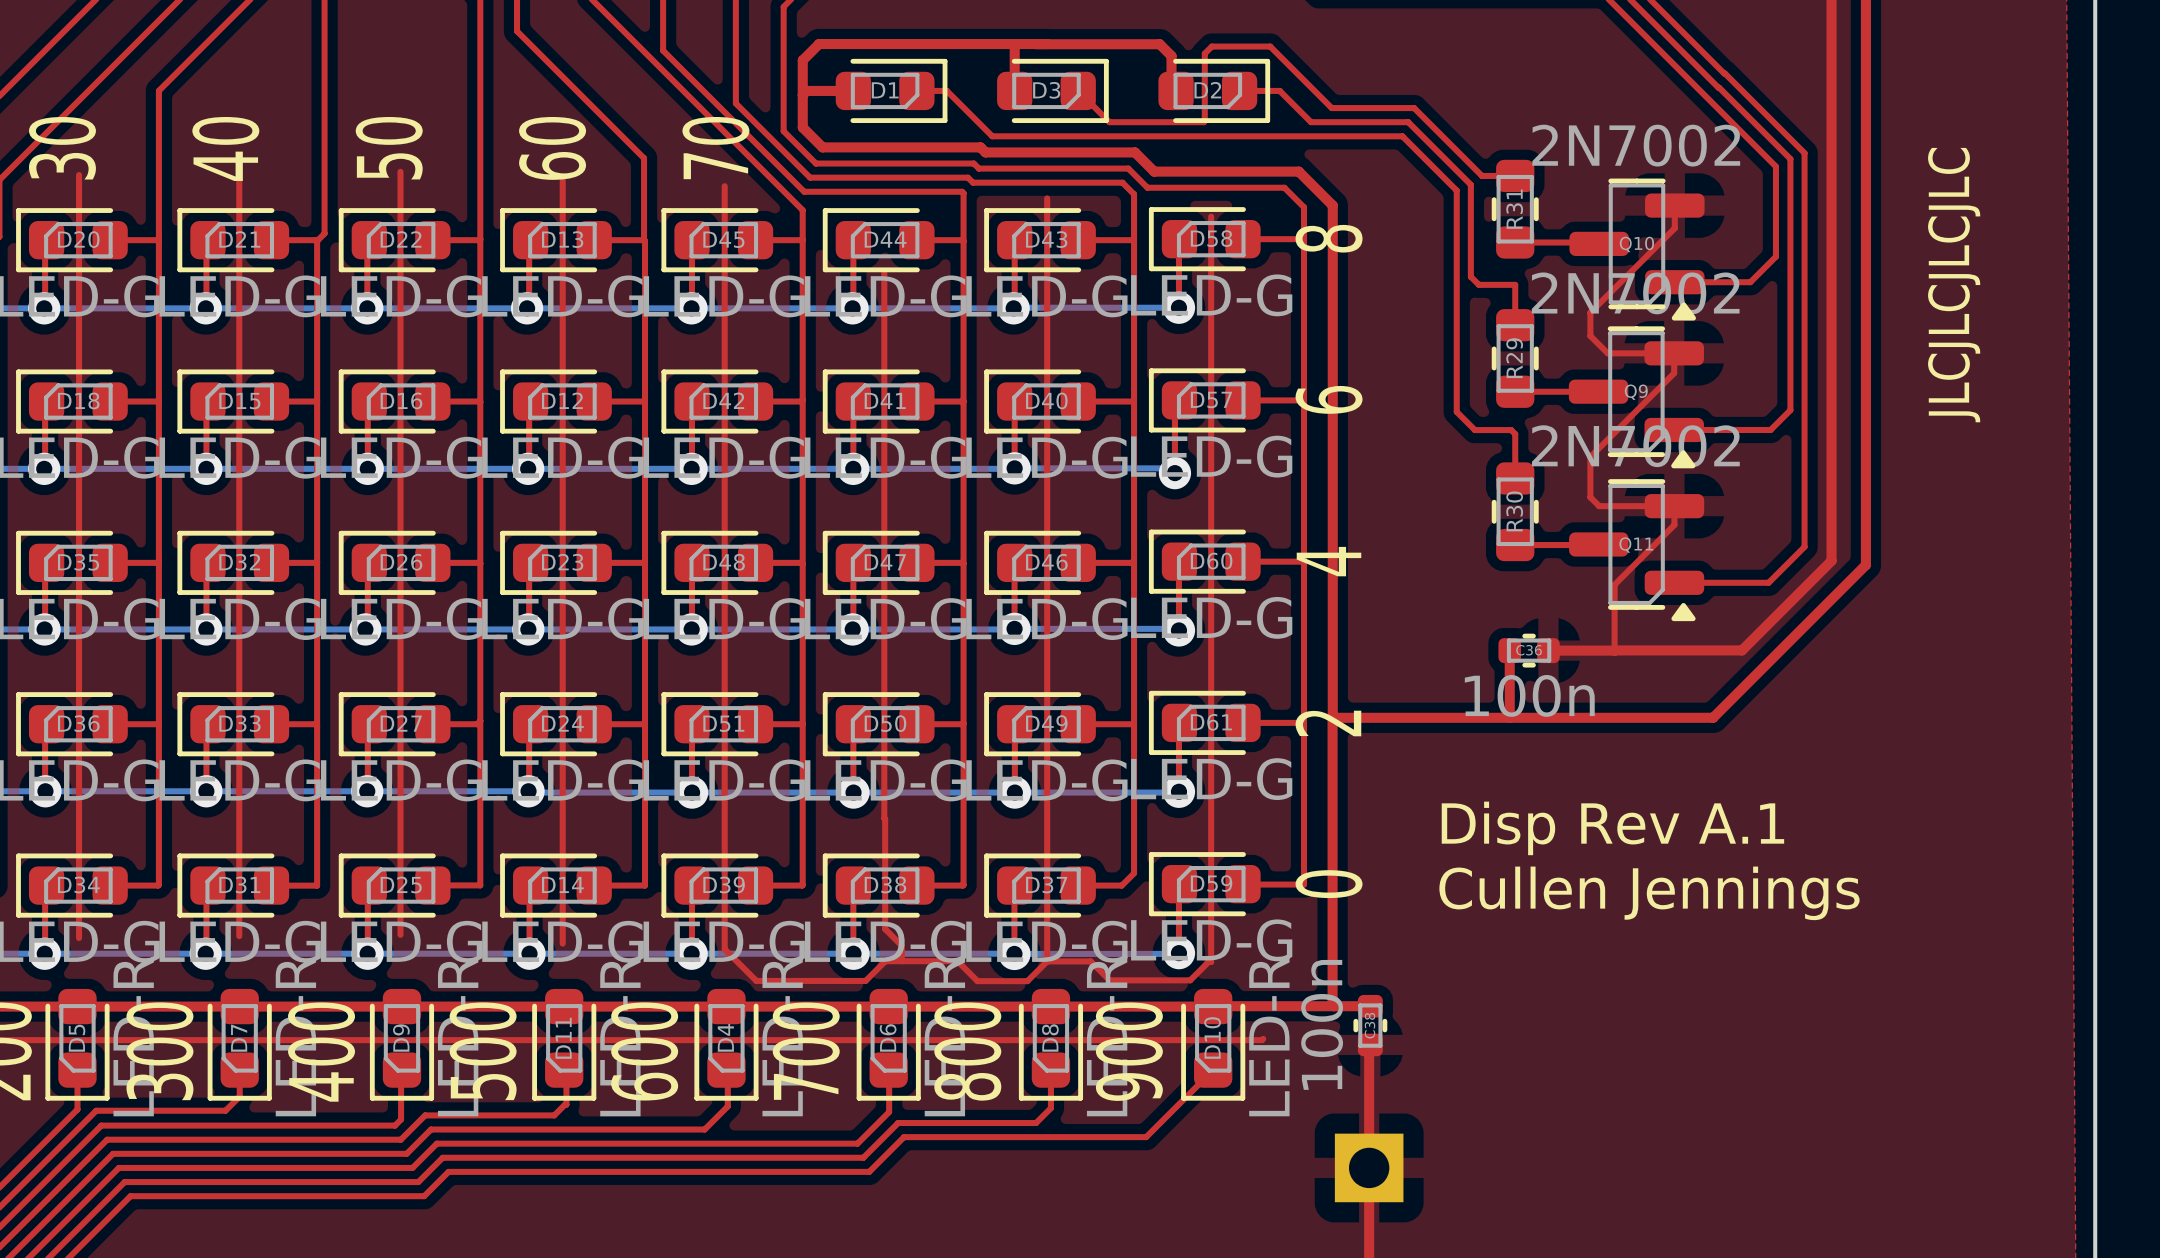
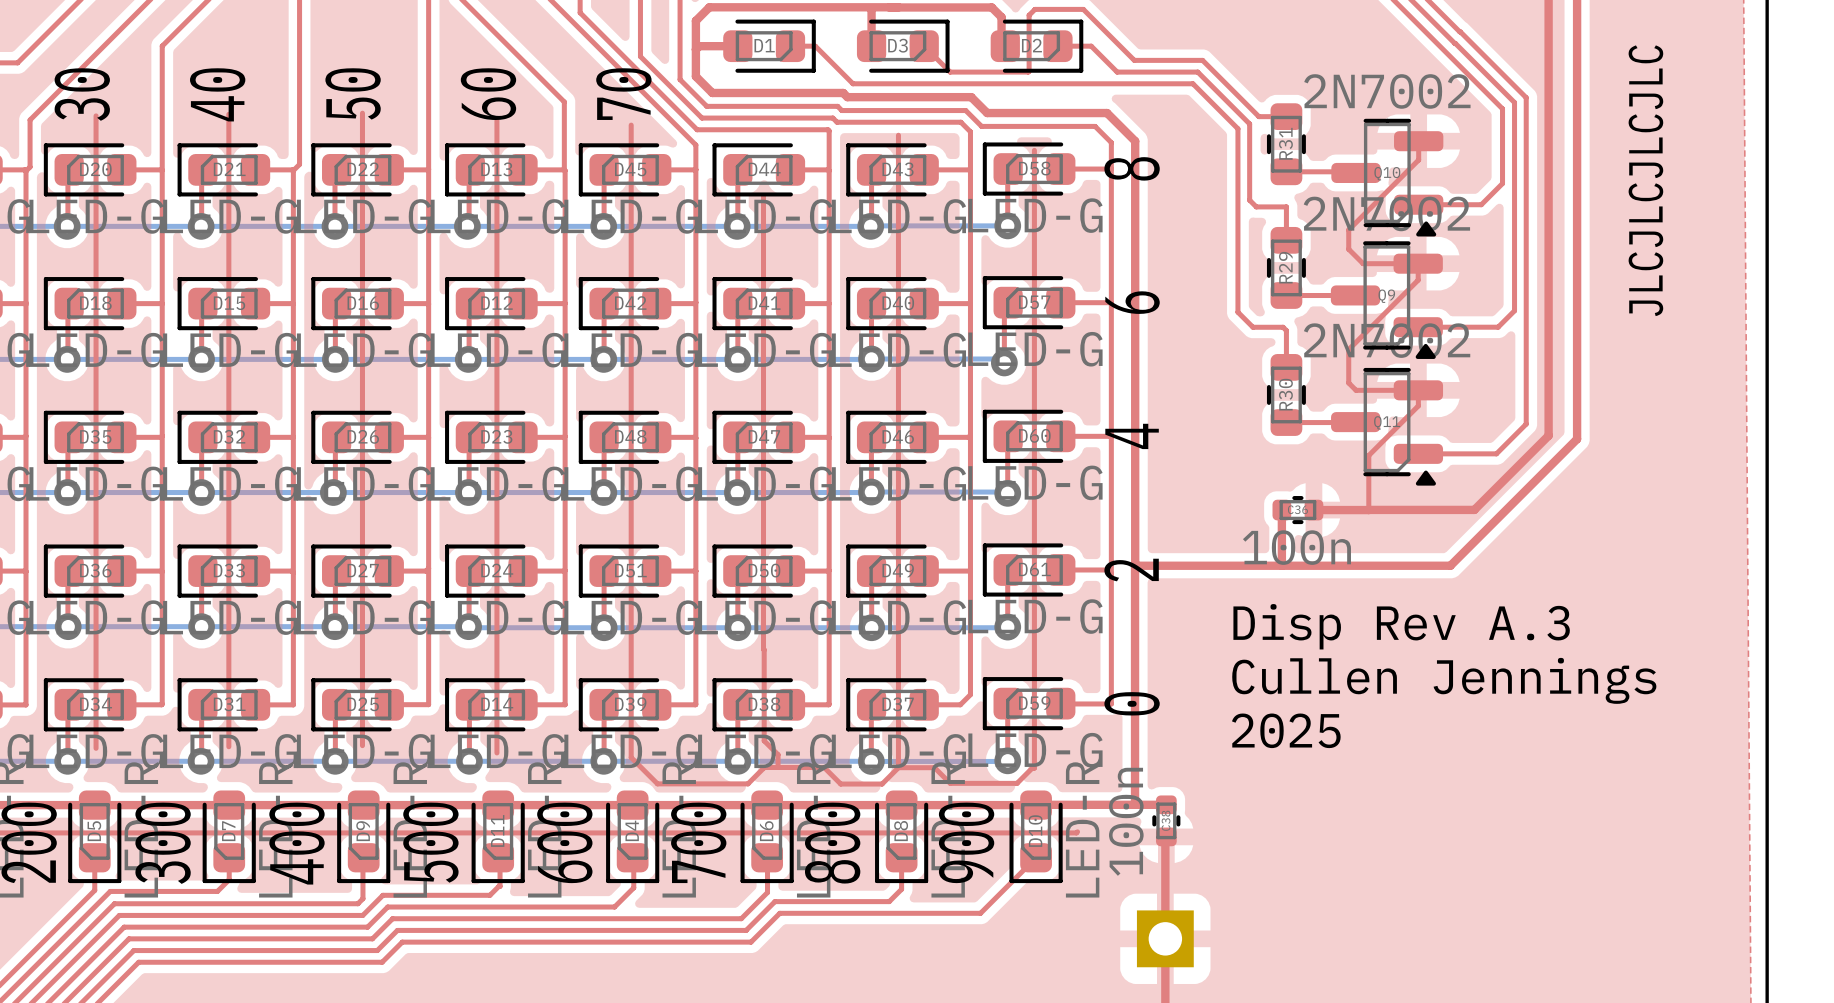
text: Disp Rev A.1 (1612, 828) -> Disp Rev A.3 (1401, 626)
text position: Cullen Jennings (1649, 893) -> Cullen Jennings (1444, 680)
text: none -> 2025 (1286, 730)

